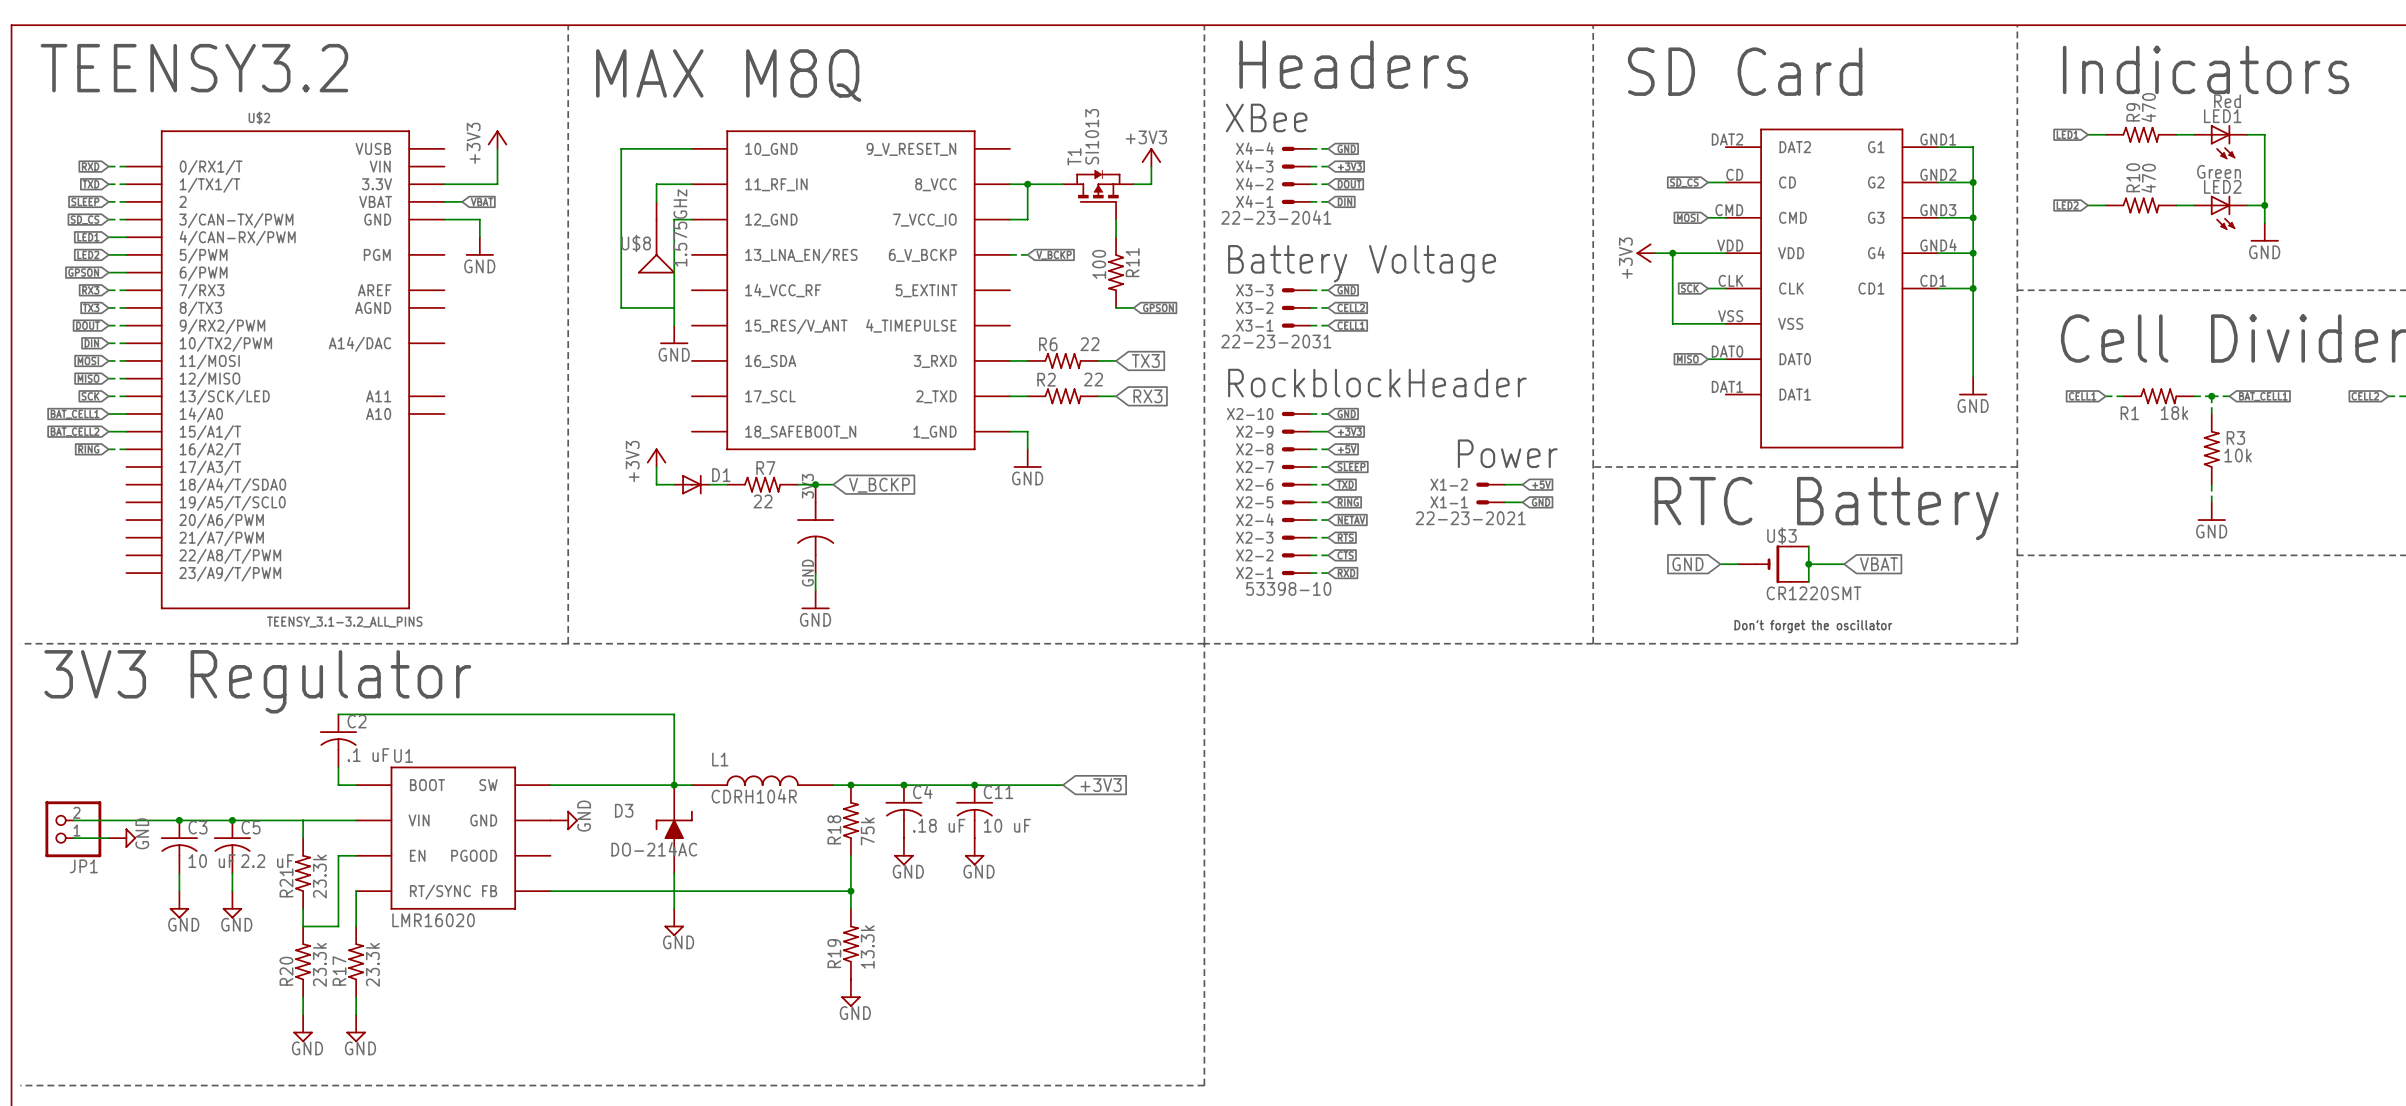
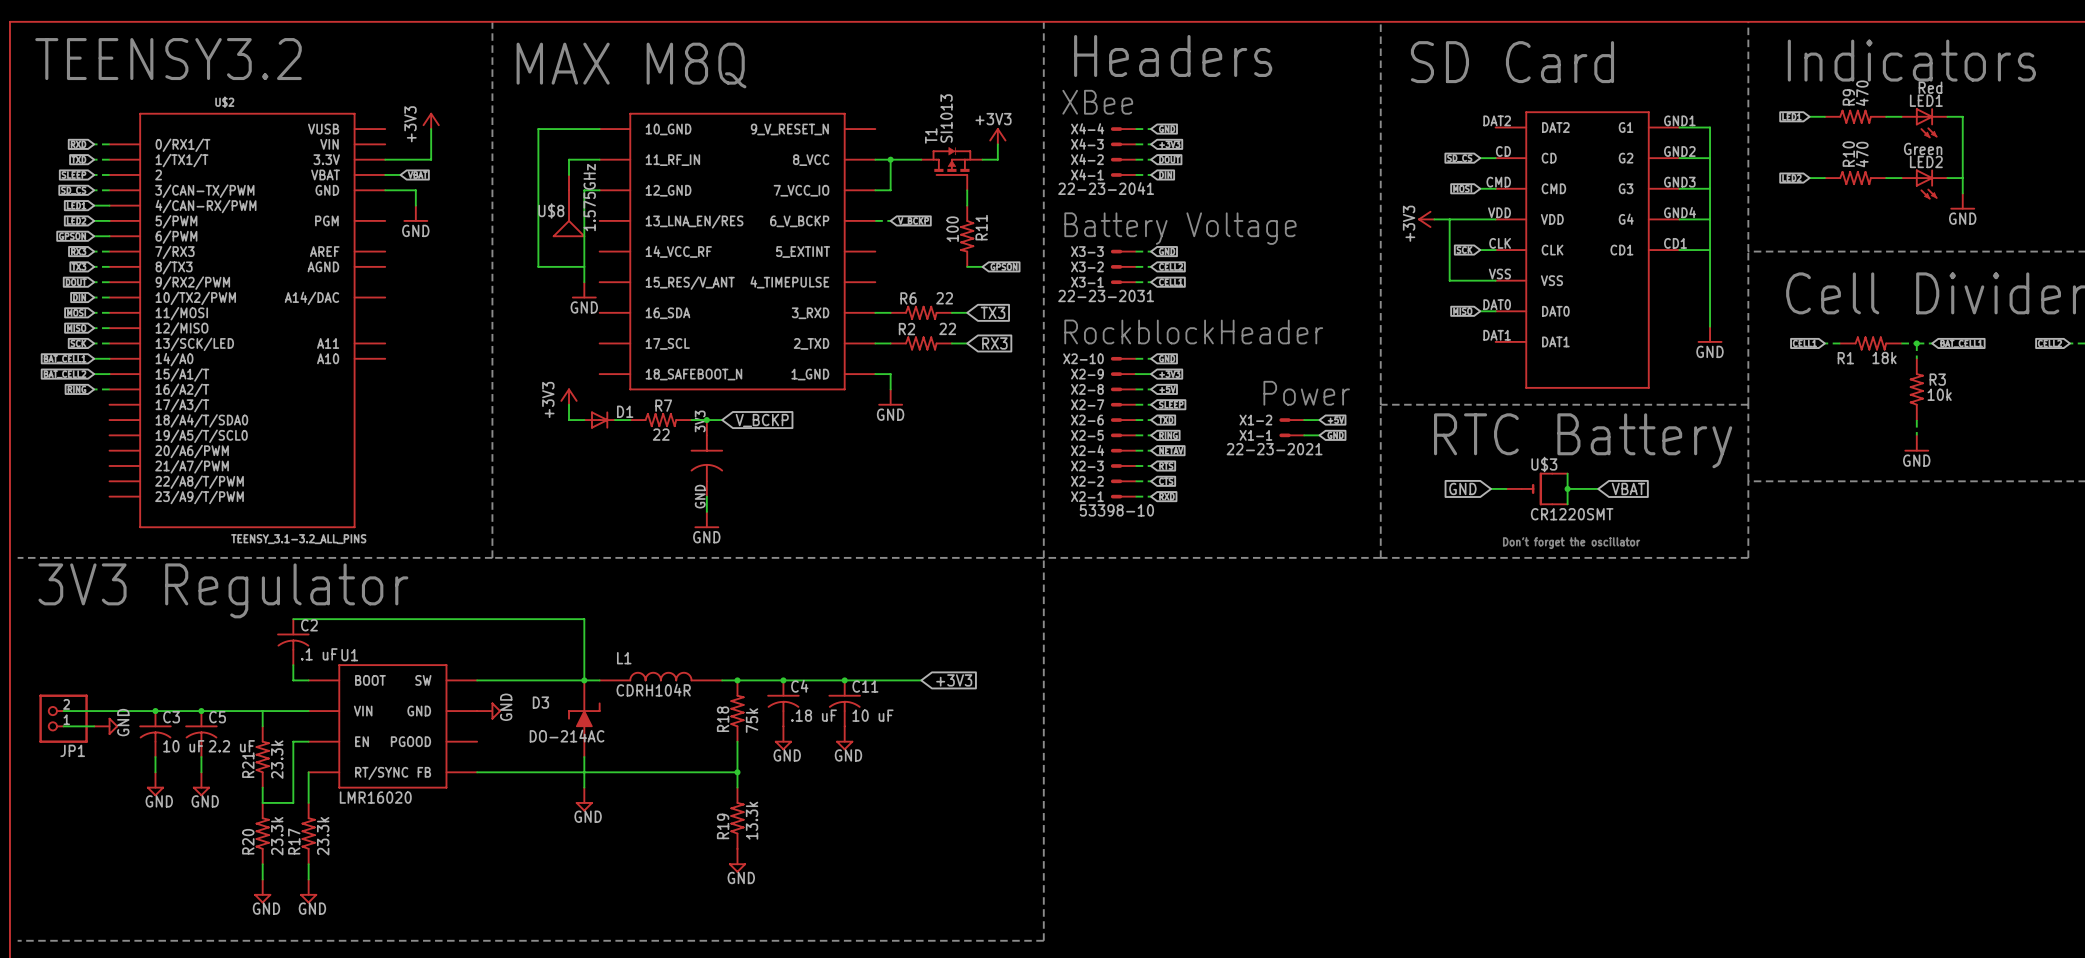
junction: (1973, 182) -> none
junction: (2264, 205) -> none
junction: (1973, 217) -> none
junction: (1672, 253) -> none
junction: (1973, 253) -> none
junction: (1973, 288) -> none

